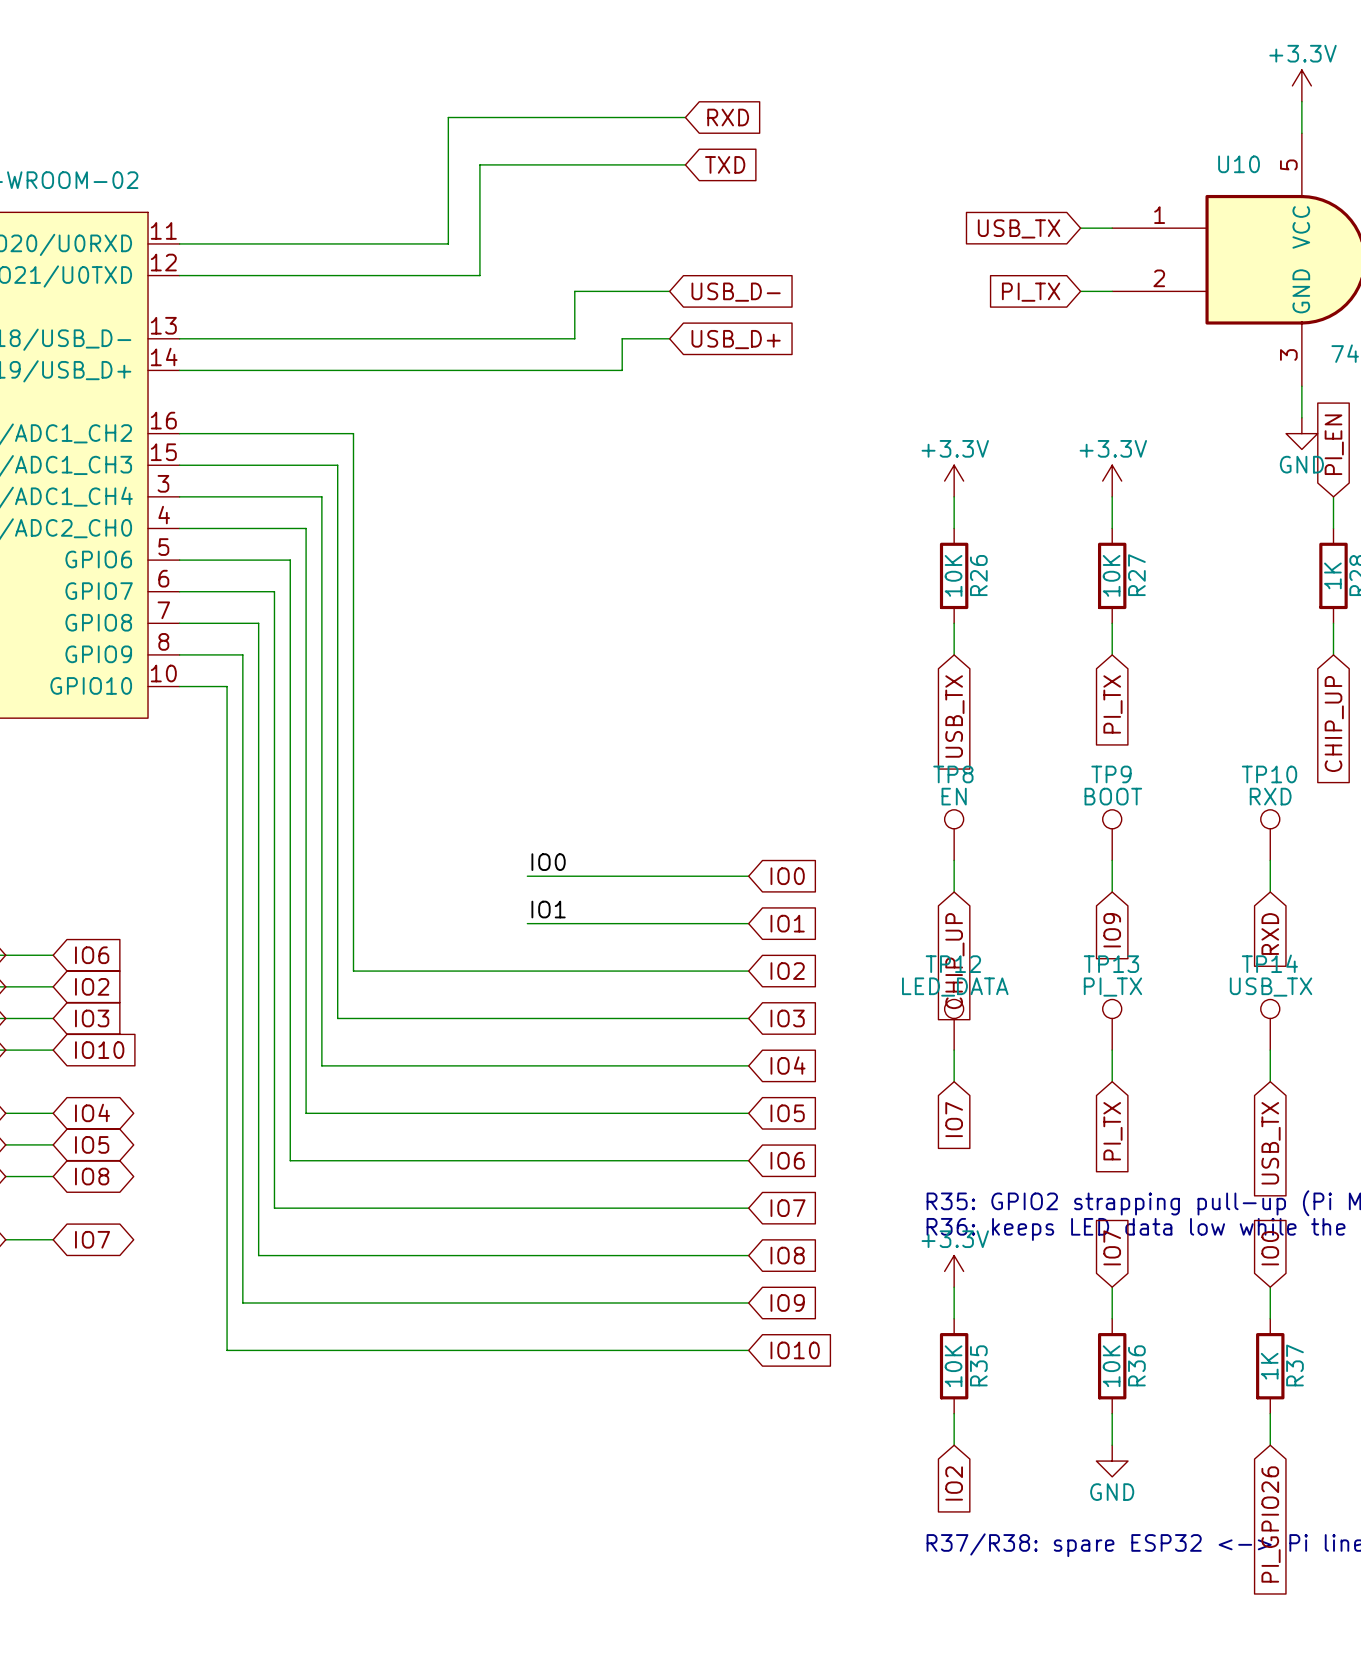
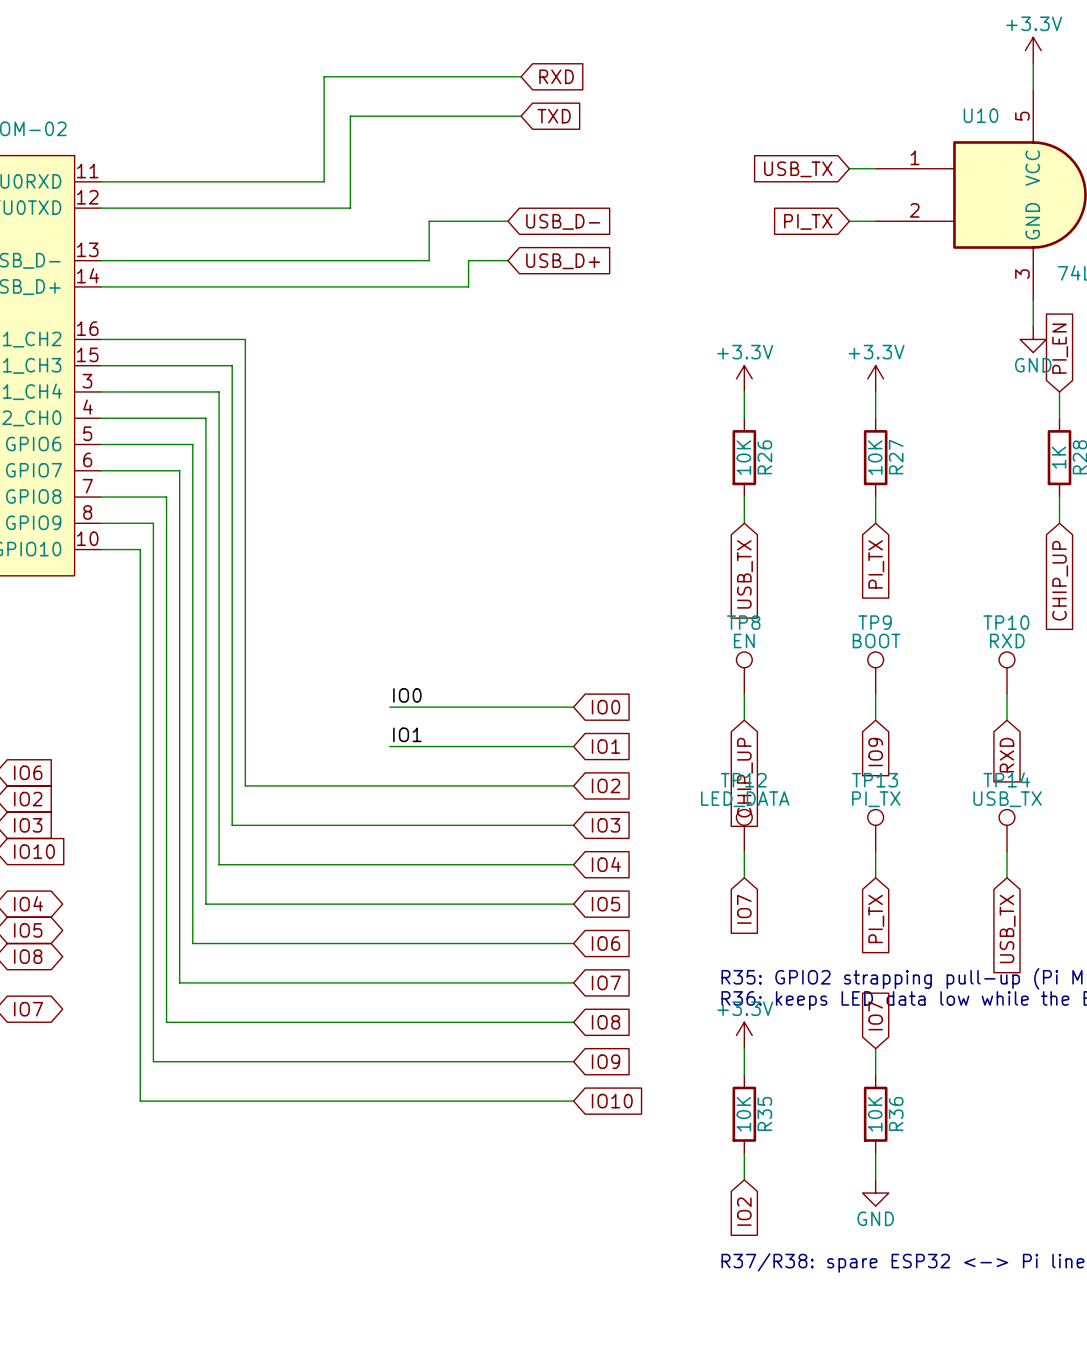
global label: IO0 (1270, 1248) -> none
wire: (1270, 1287) (1270, 1318) -> none
R37: 1K (1270, 1366) -> none
wire: (1270, 1413) (1270, 1445) -> none
global label: PI_GPIO26 (1271, 1524) -> none

